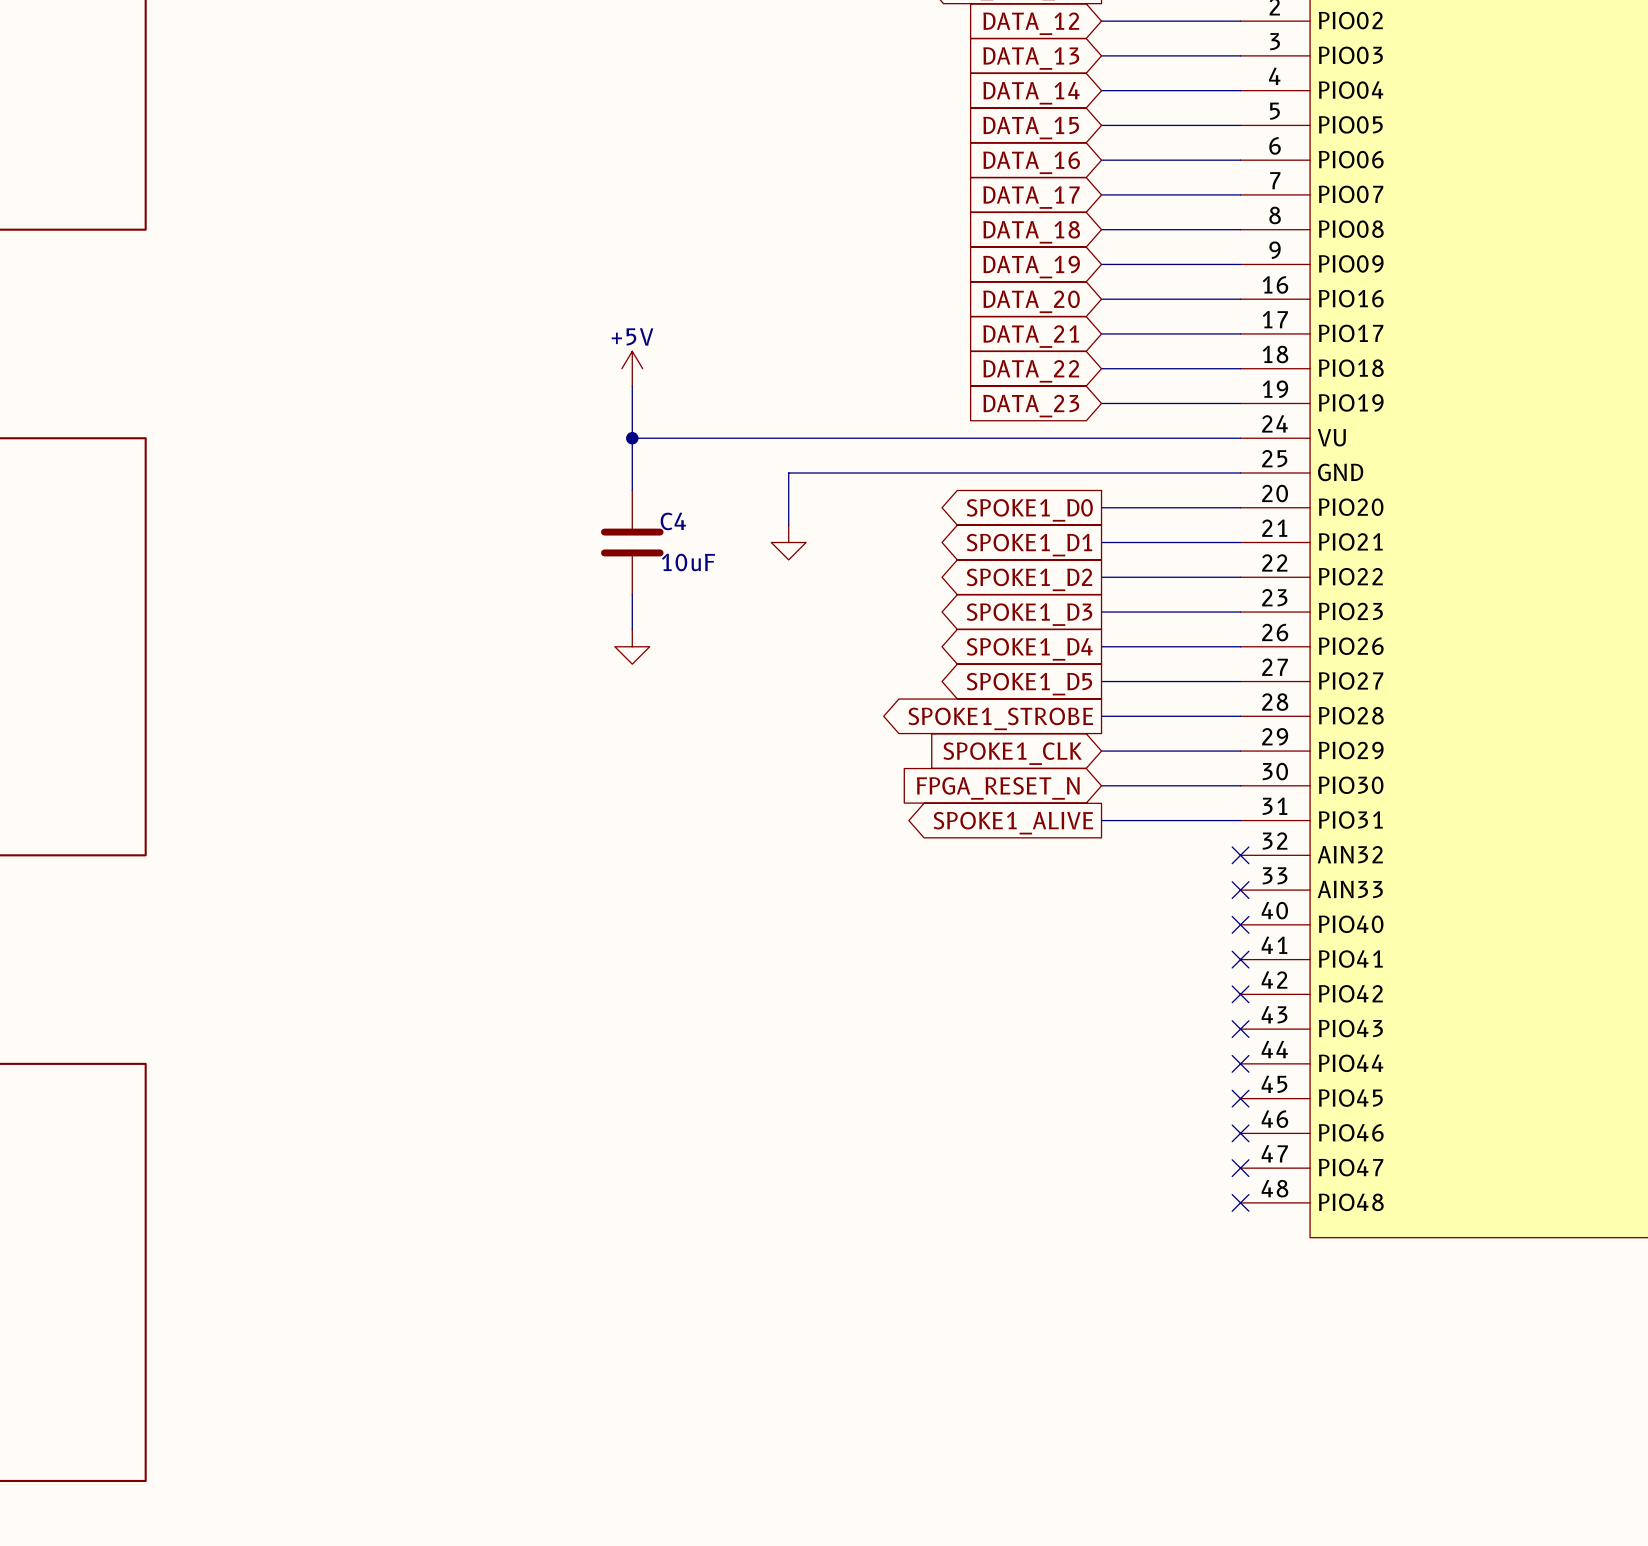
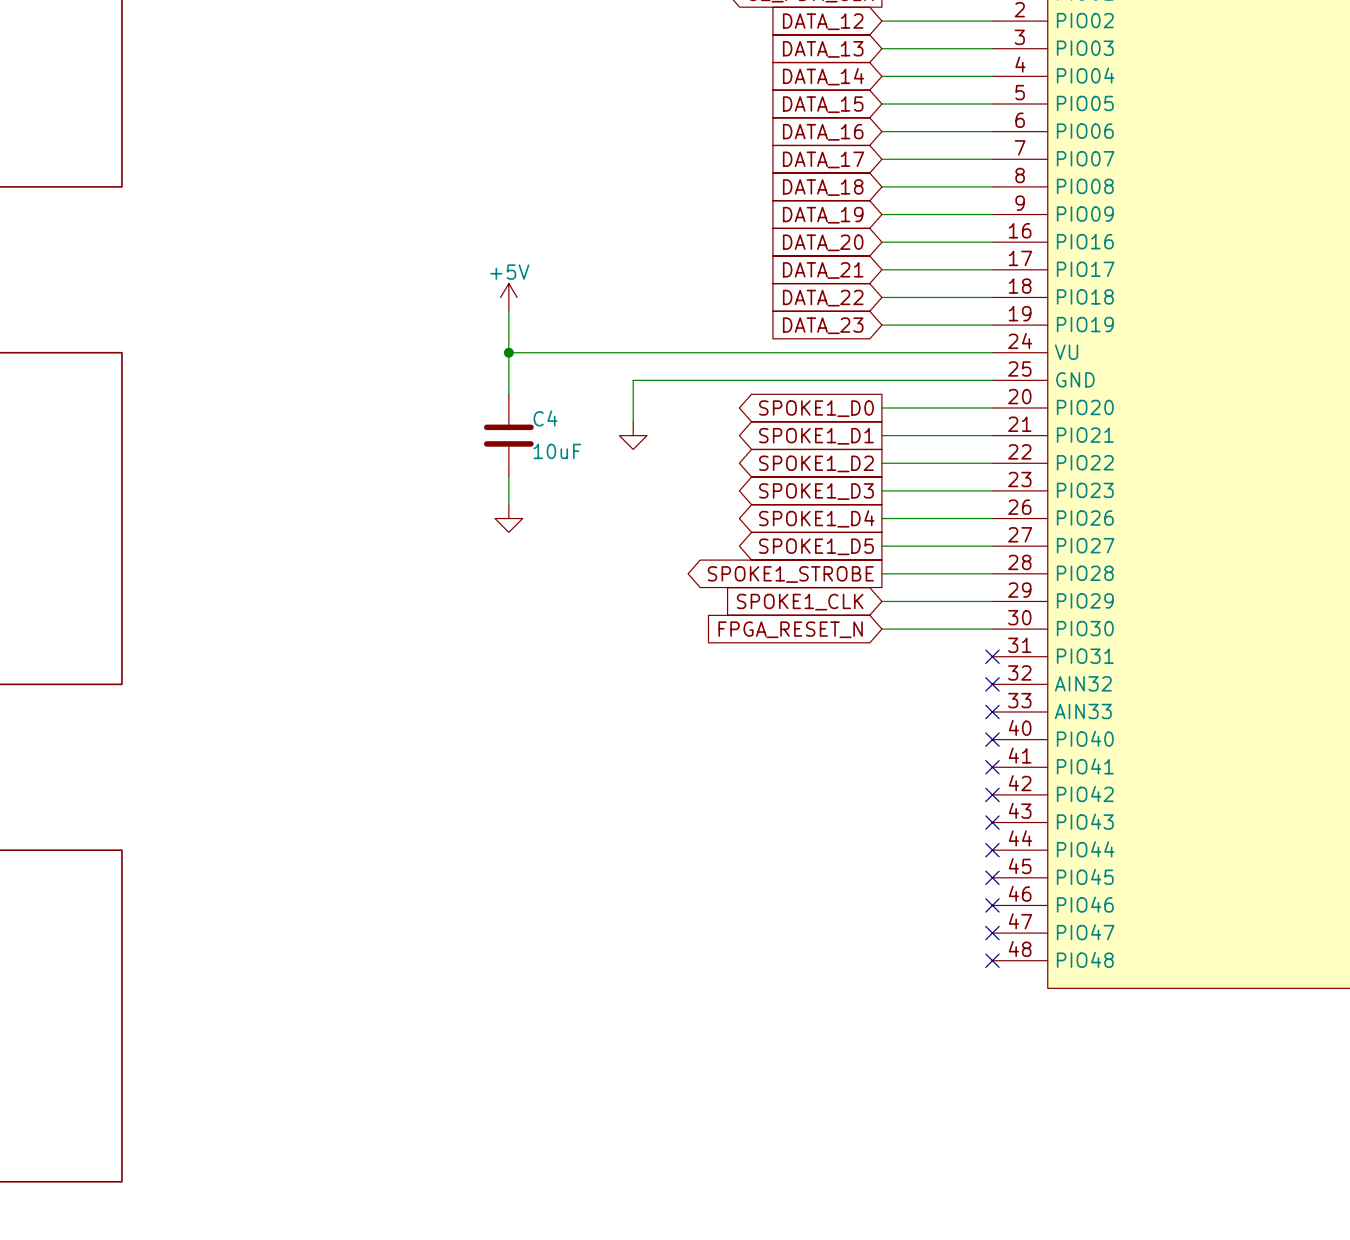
wire: (1101, 820) (1240, 820) -> none
no-connect mark: none -> (992, 656)
global label: SPOKE1_ALIVE (1013, 823) -> none

